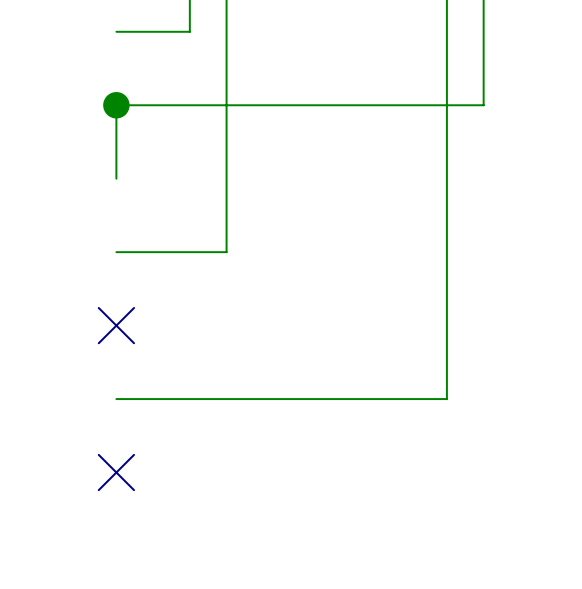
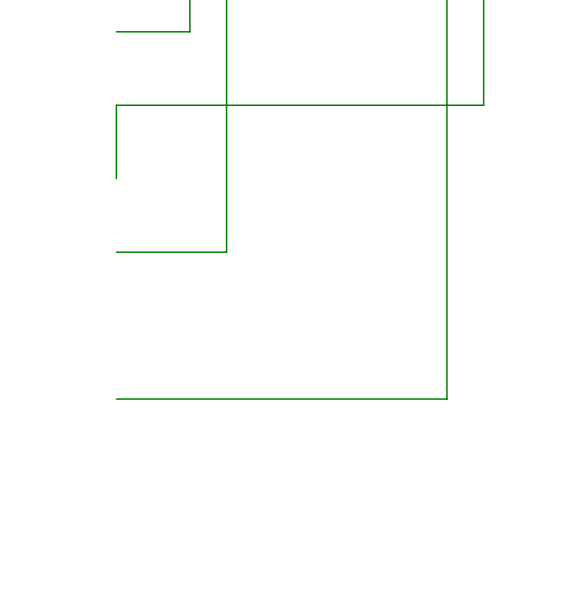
junction: (116, 105) -> none
no-connect mark: (116, 325) -> none
no-connect mark: (116, 472) -> none

